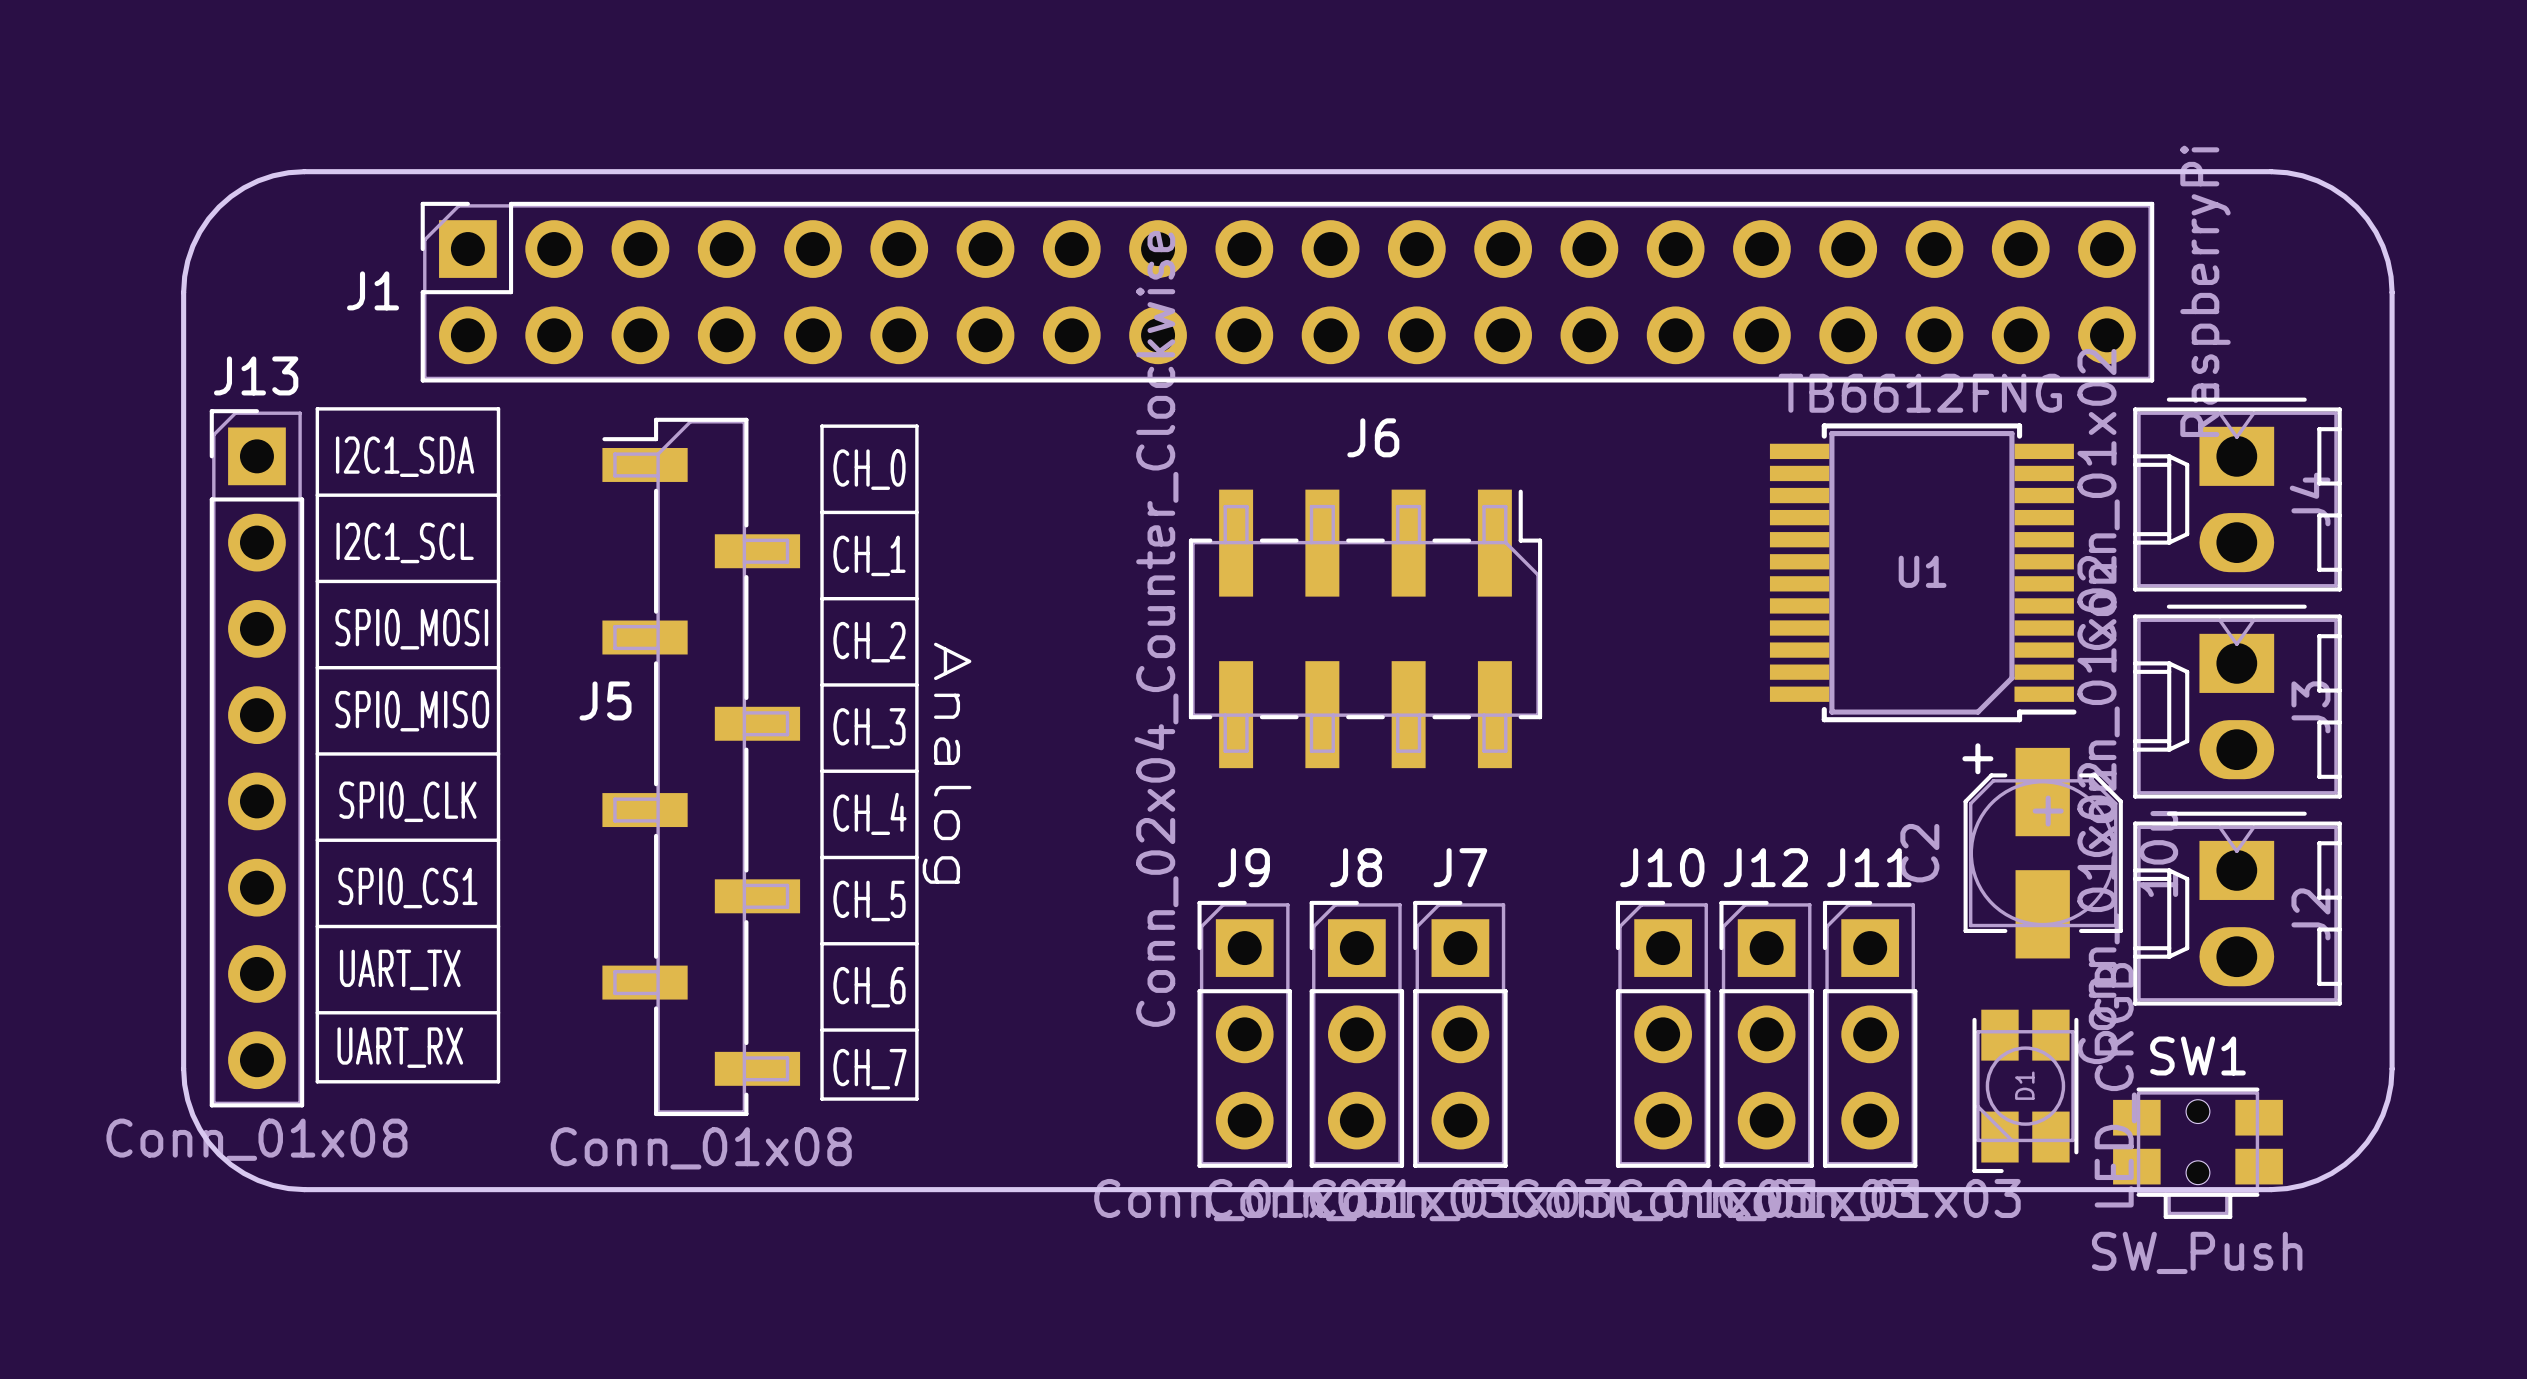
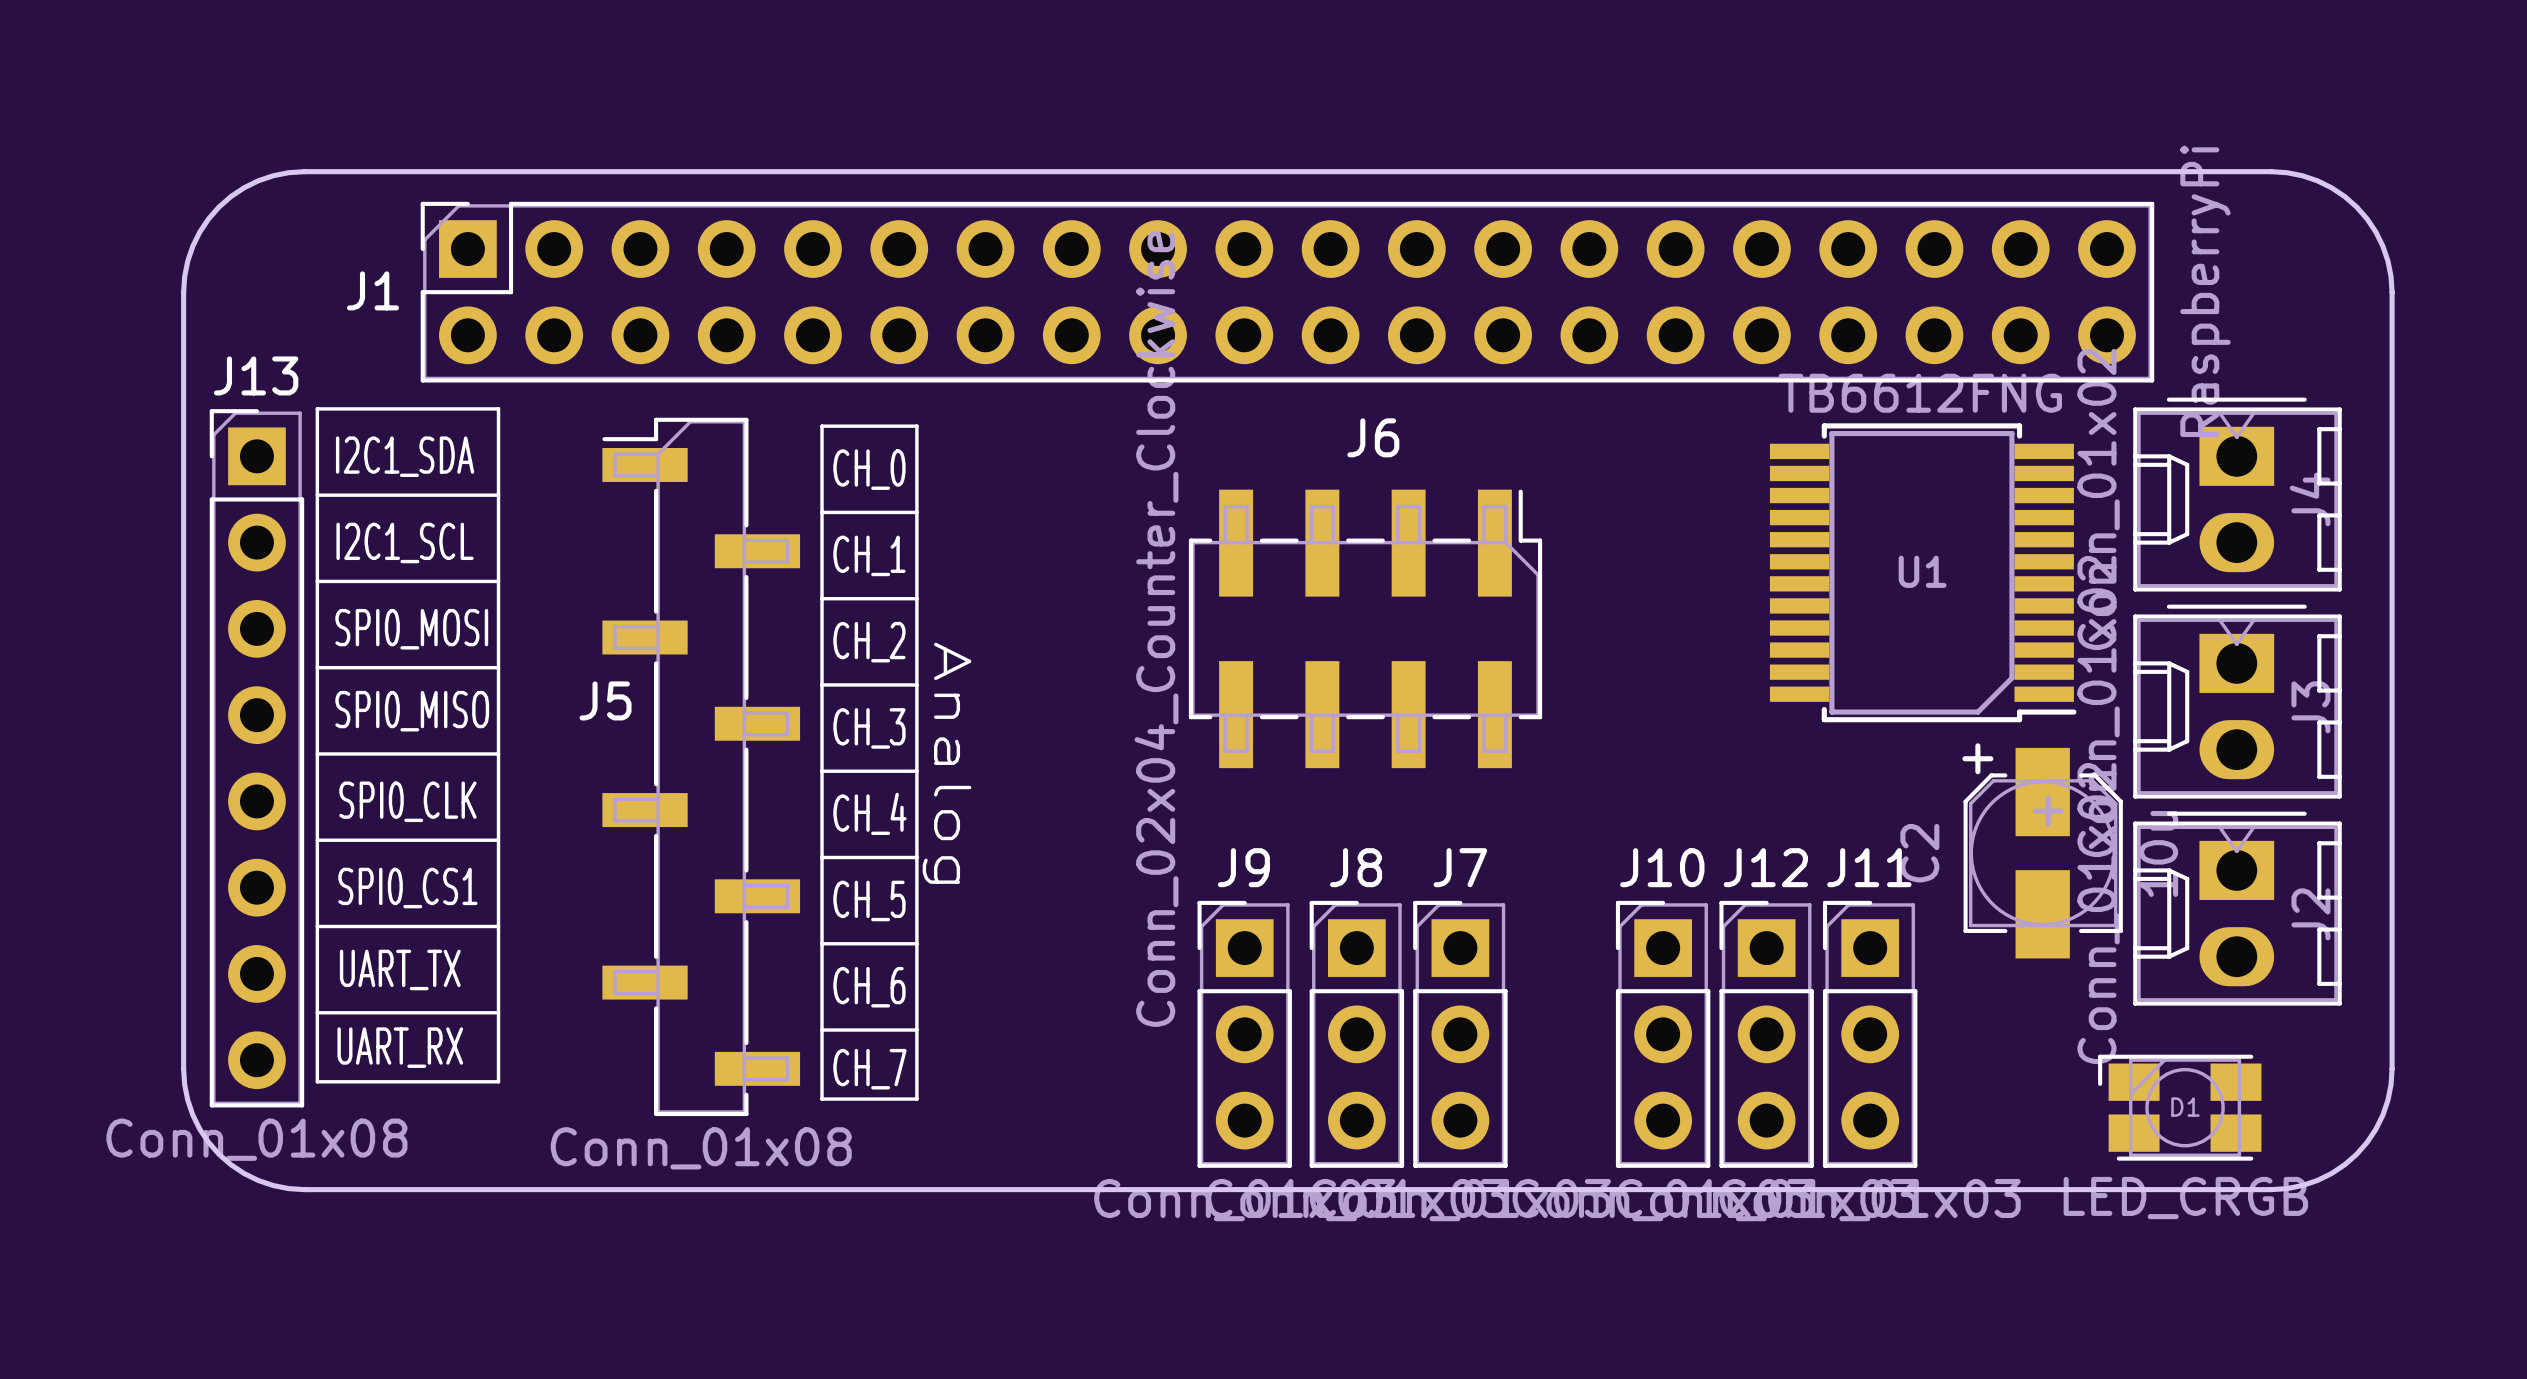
D1 rotation: 0° (2025, 1091) -> 90° clockwise (2179, 1107)
D1 position: (2025, 1091) -> (2179, 1107)
SW1: SW_Push (2197, 1153) -> none

